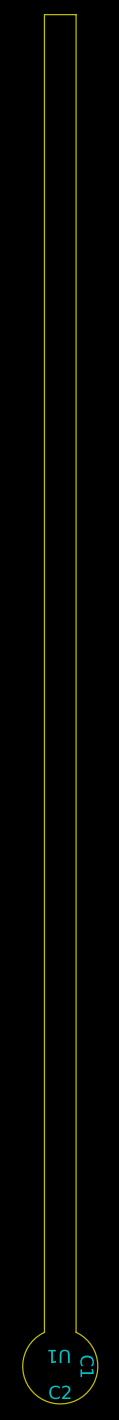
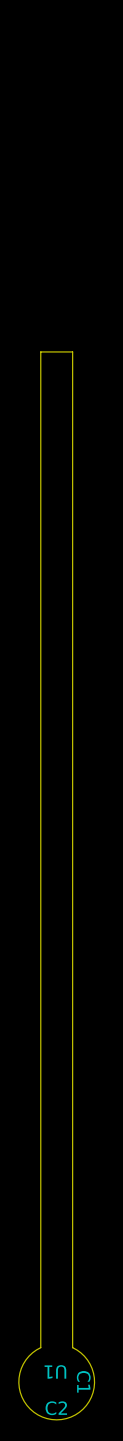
board edge: (76, 344) (76, 14) (44, 14) (44, 344) -> (72, 351) (40, 351)

